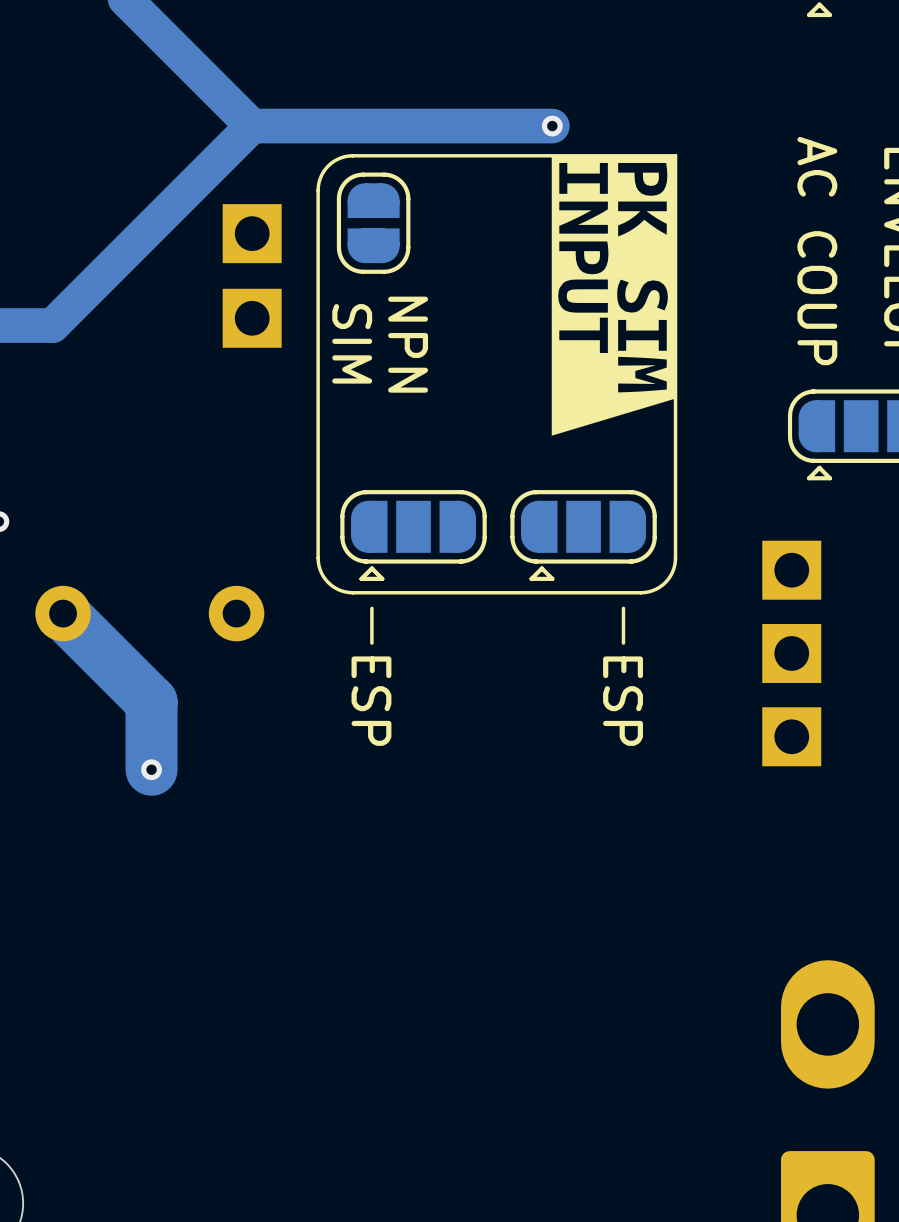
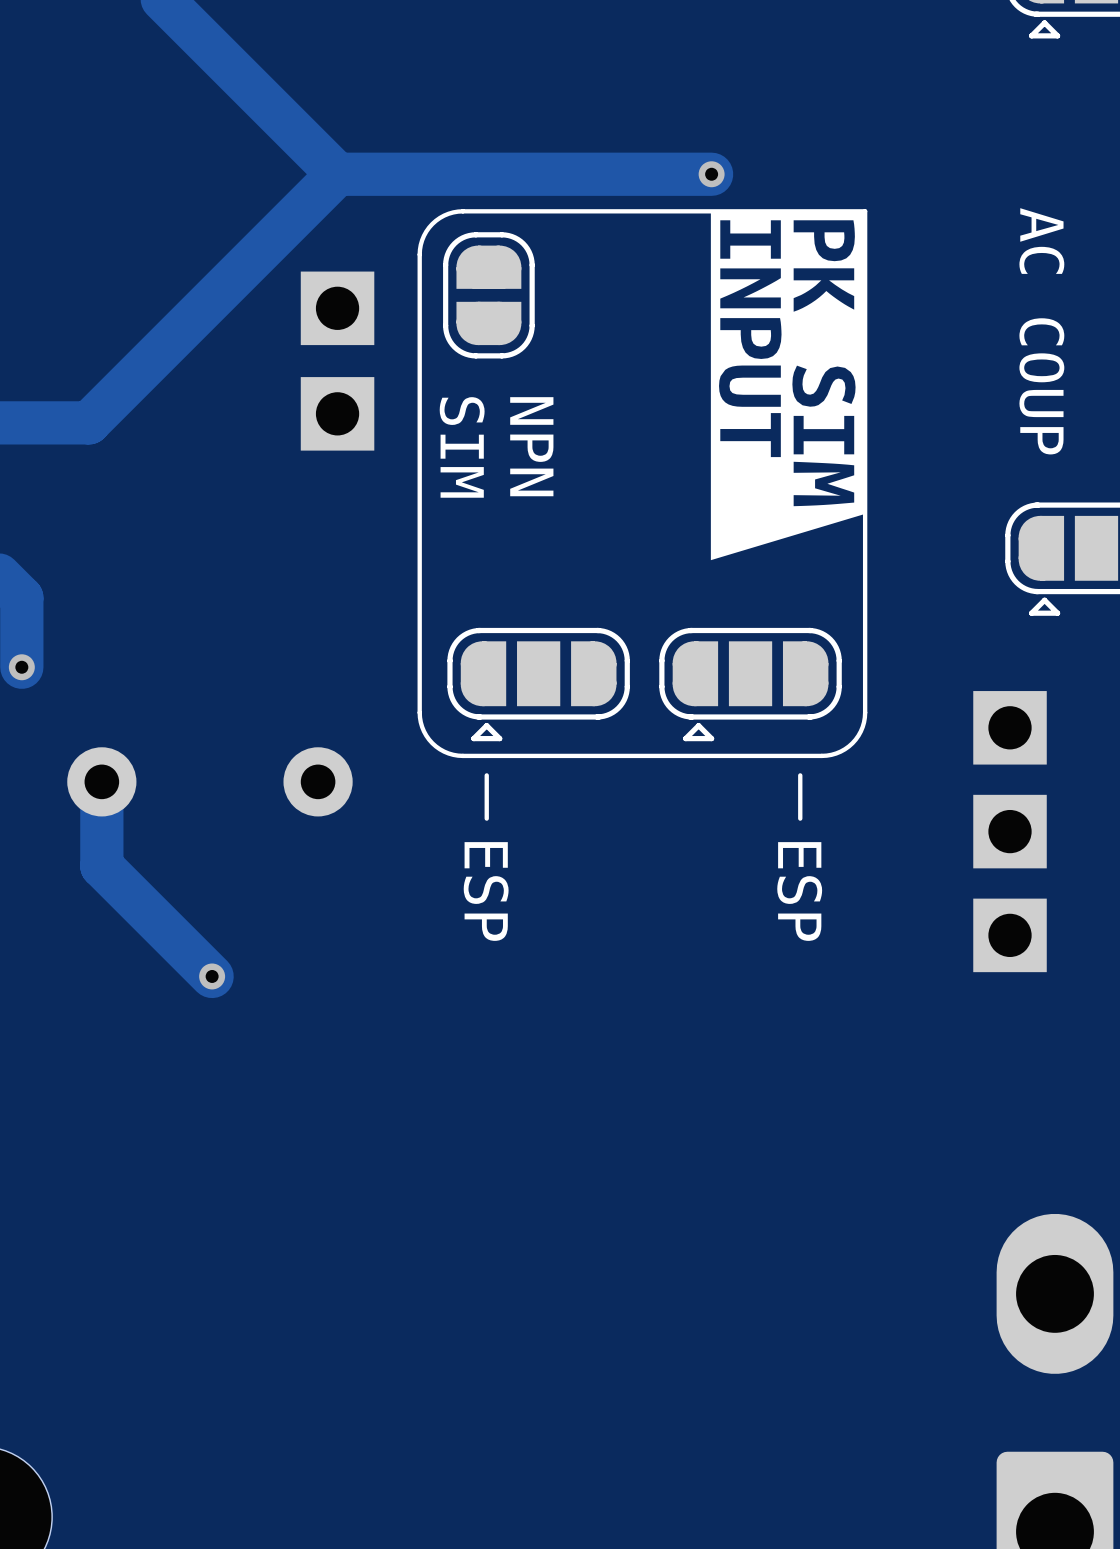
track: (63, 613) (151, 702) (151, 769) -> (101, 781) (101, 866) (212, 976)

